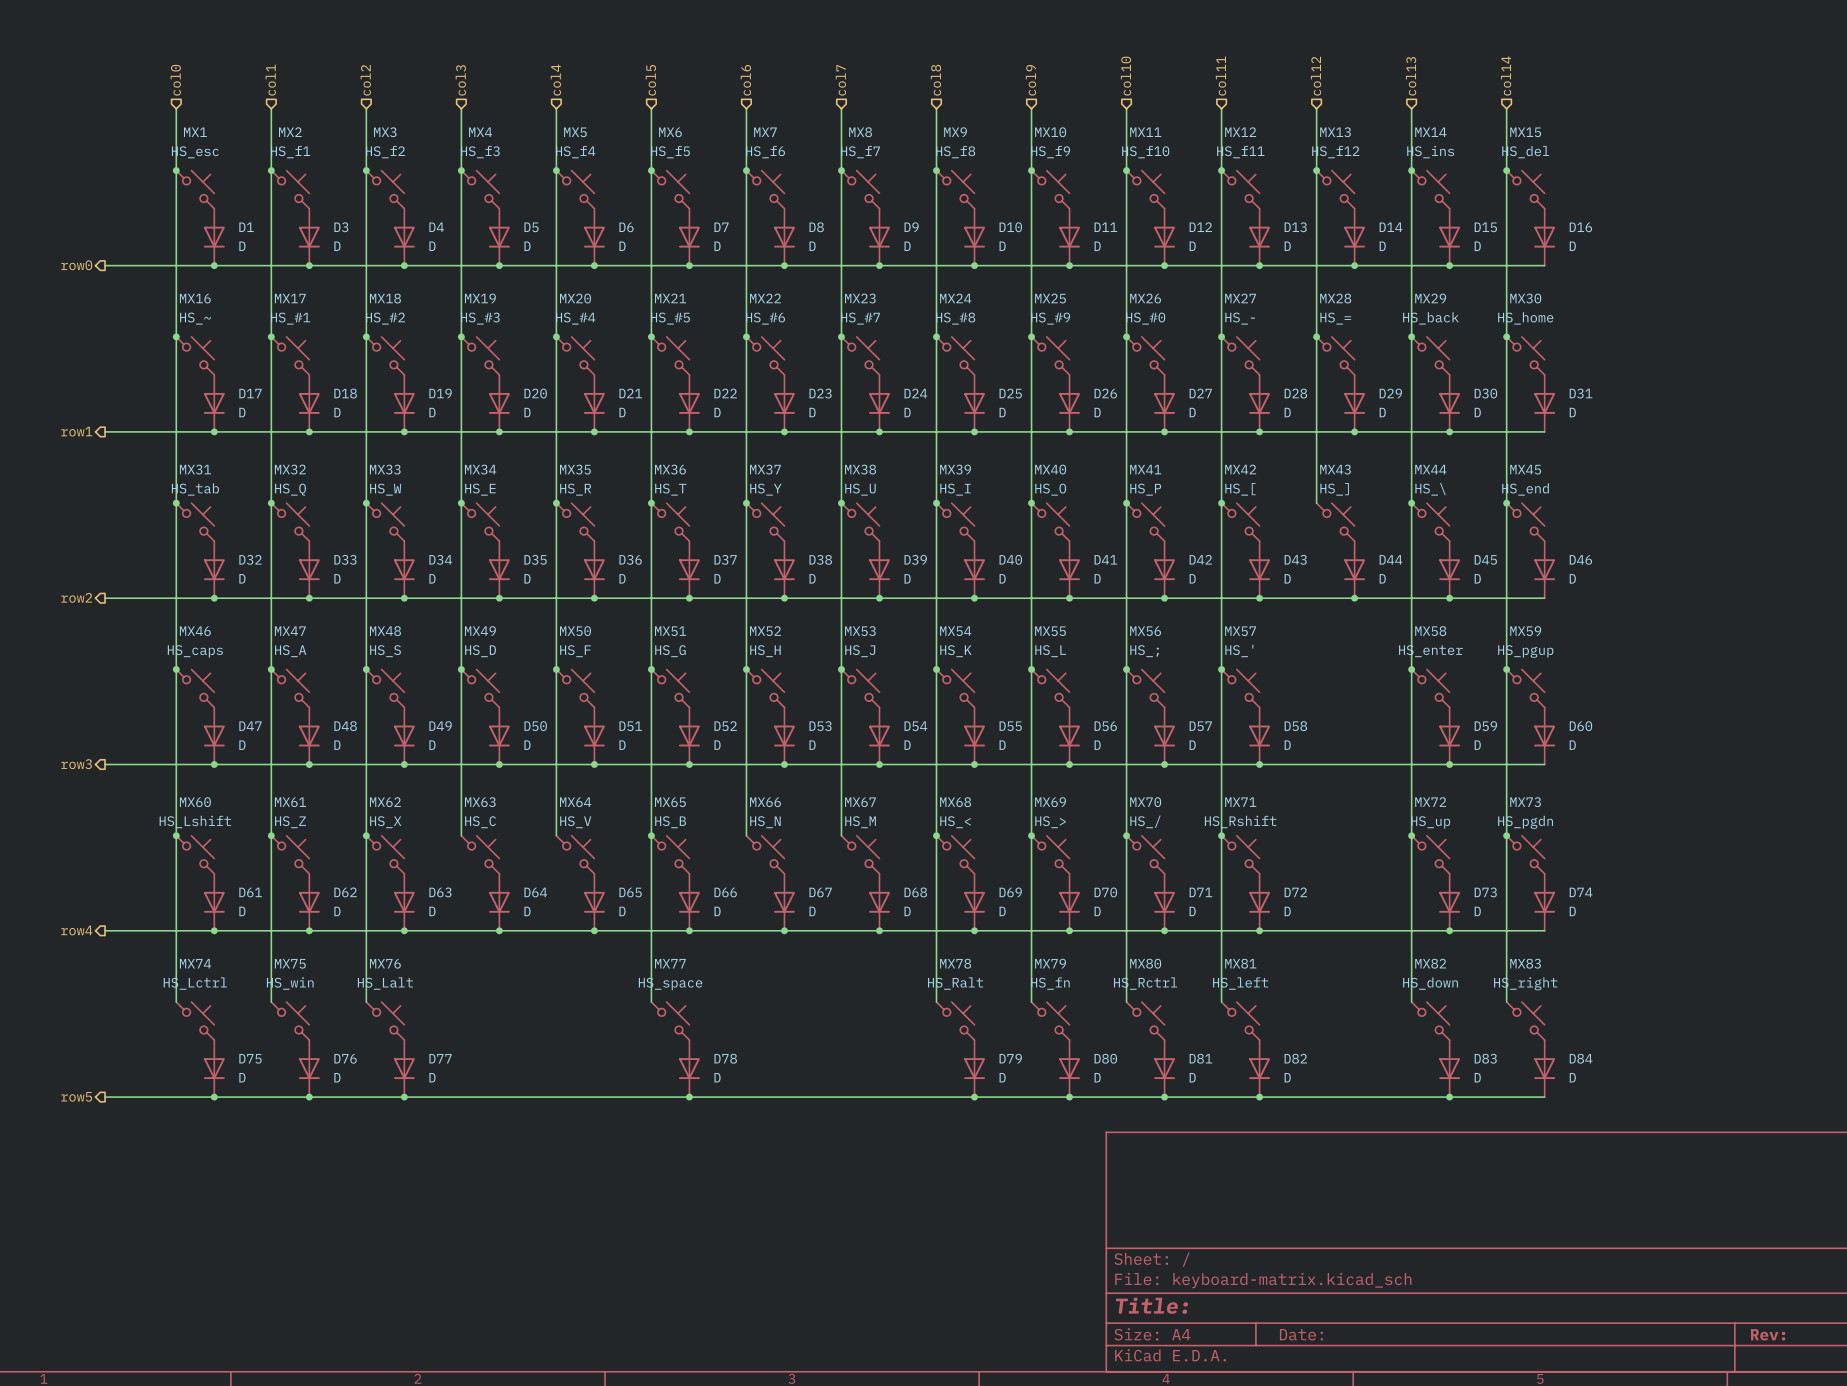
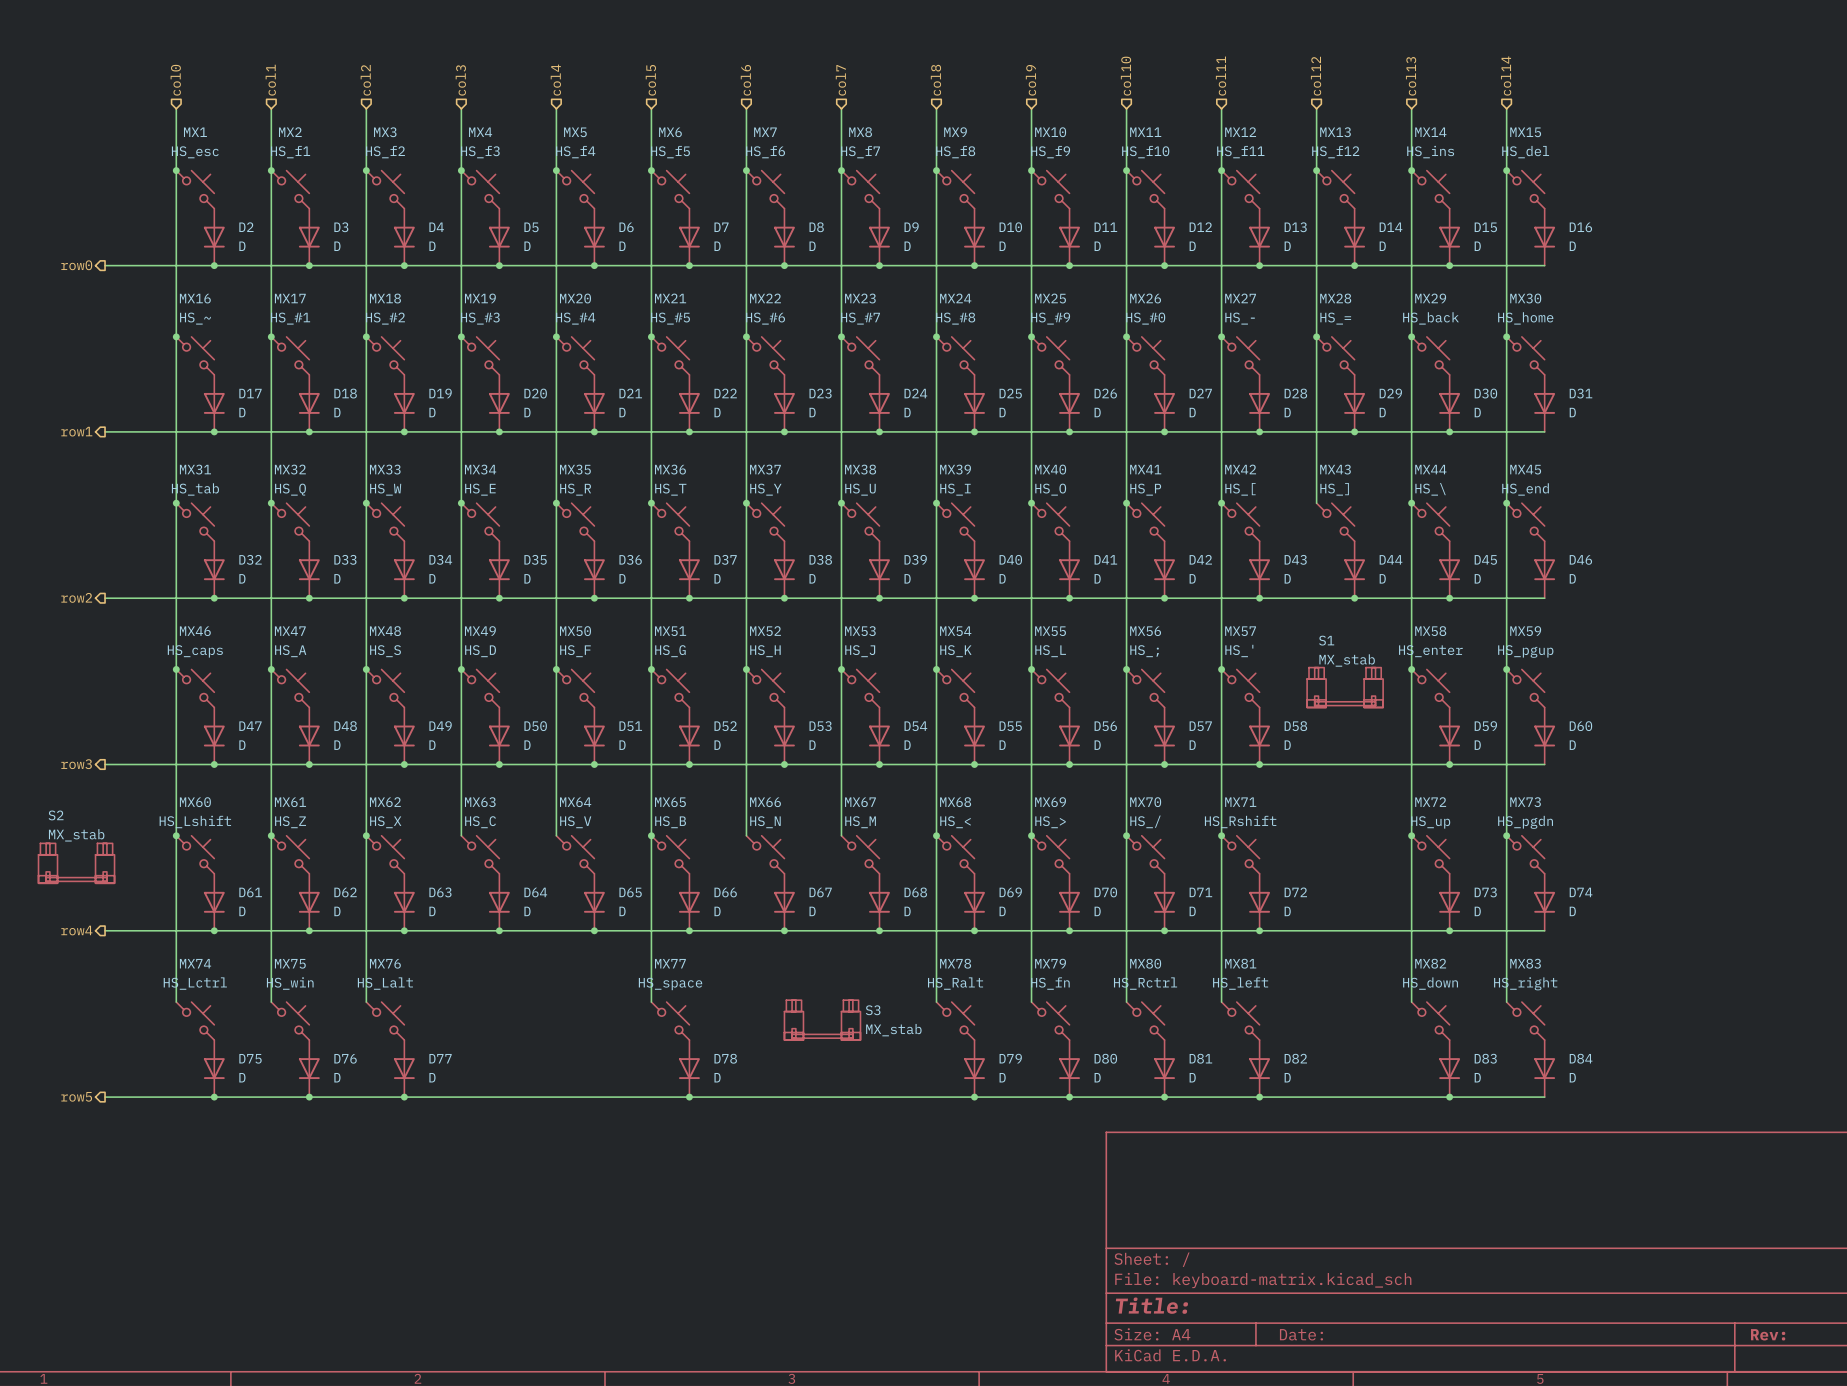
D1 name: D1 (246, 227) -> D2 (246, 227)
S1: none -> MX_stab (1345, 687)
S2: none -> MX_stab (76, 863)
S3: none -> MX_stab (822, 1020)

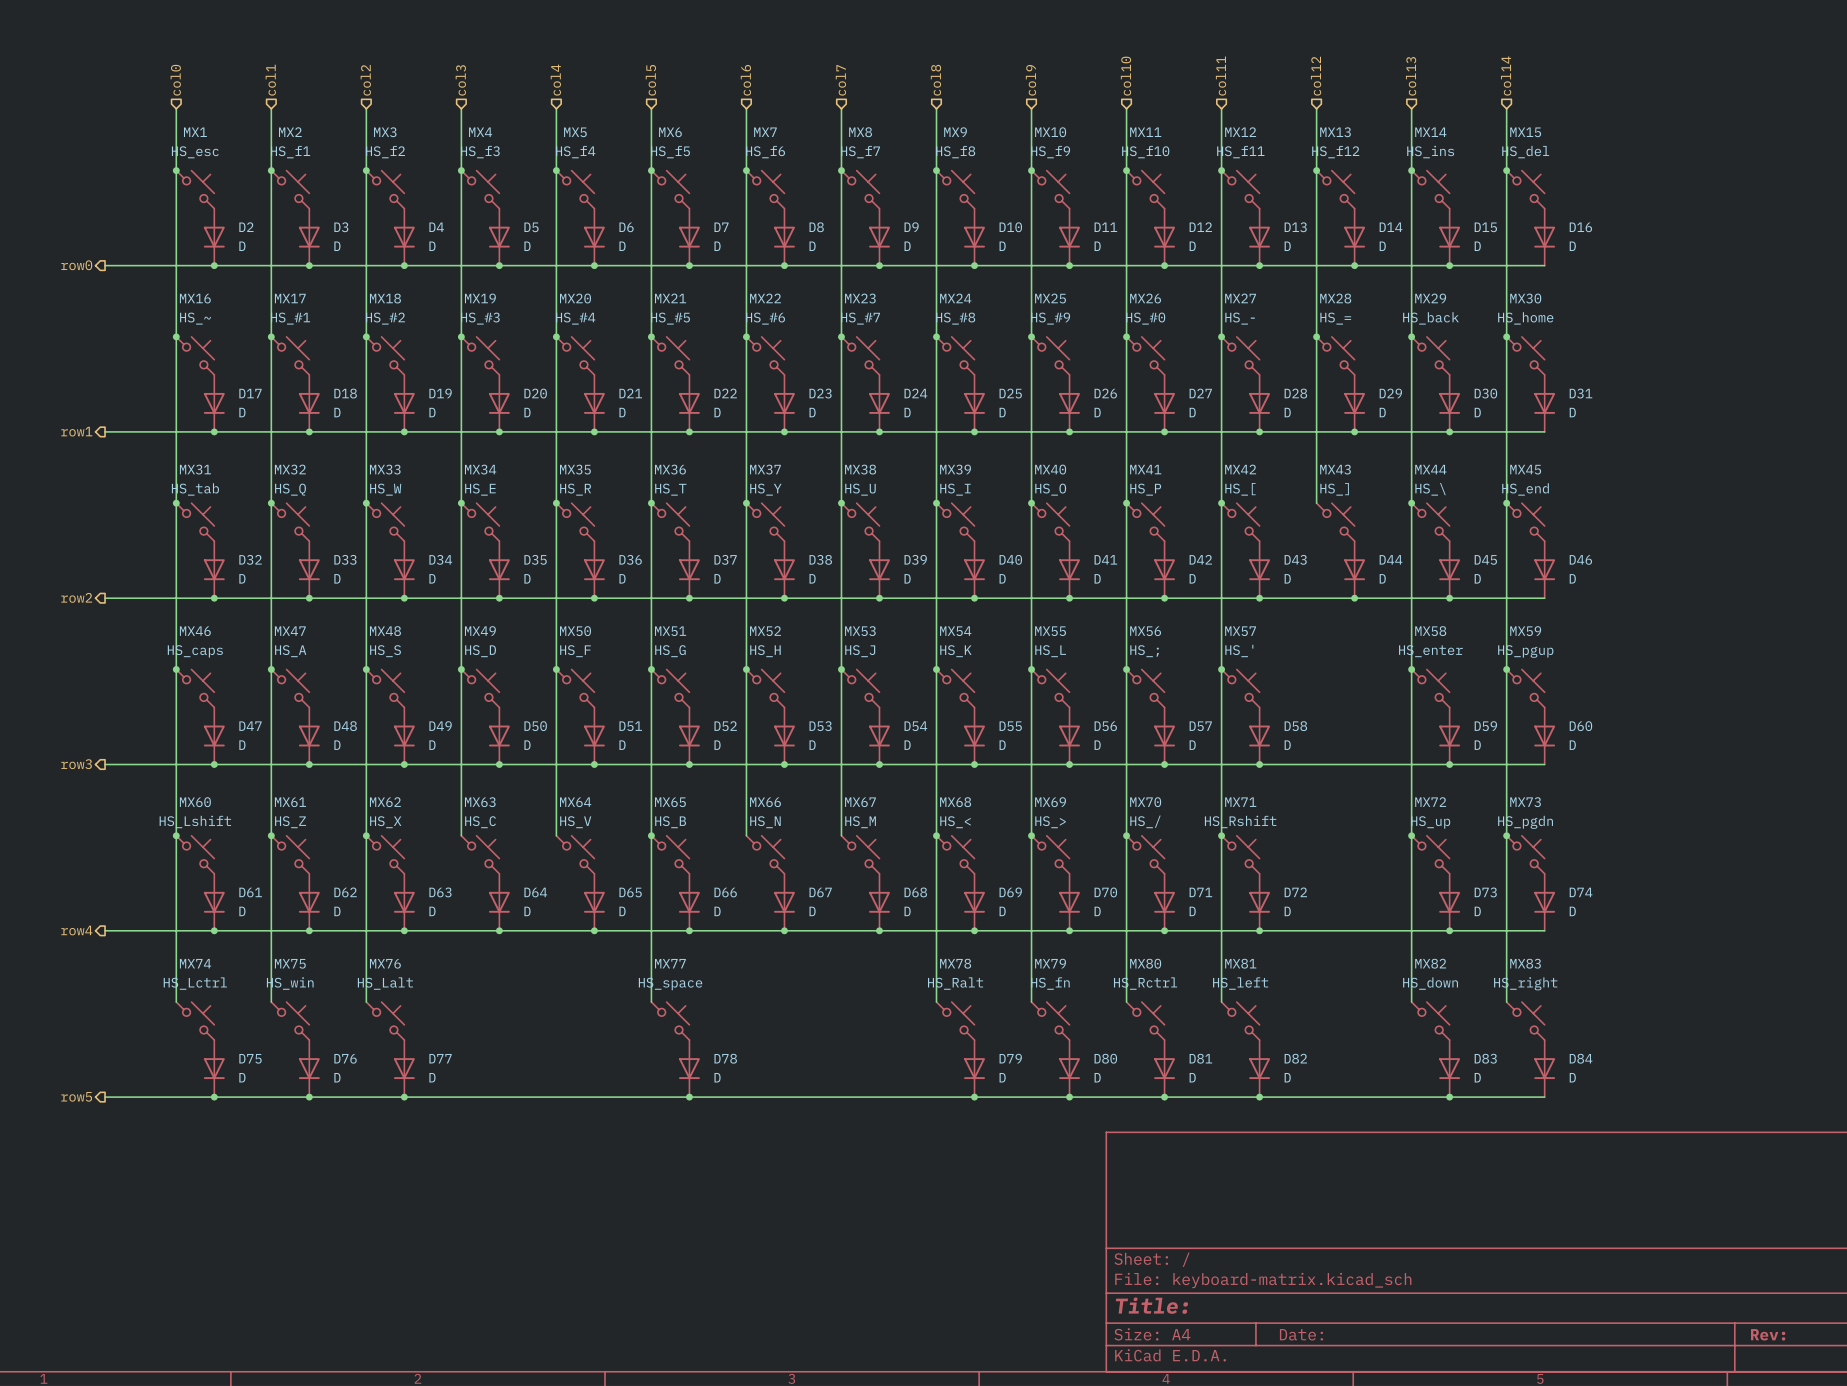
S1: MX_stab (1345, 687) -> none
S2: MX_stab (76, 863) -> none
S3: MX_stab (822, 1020) -> none

